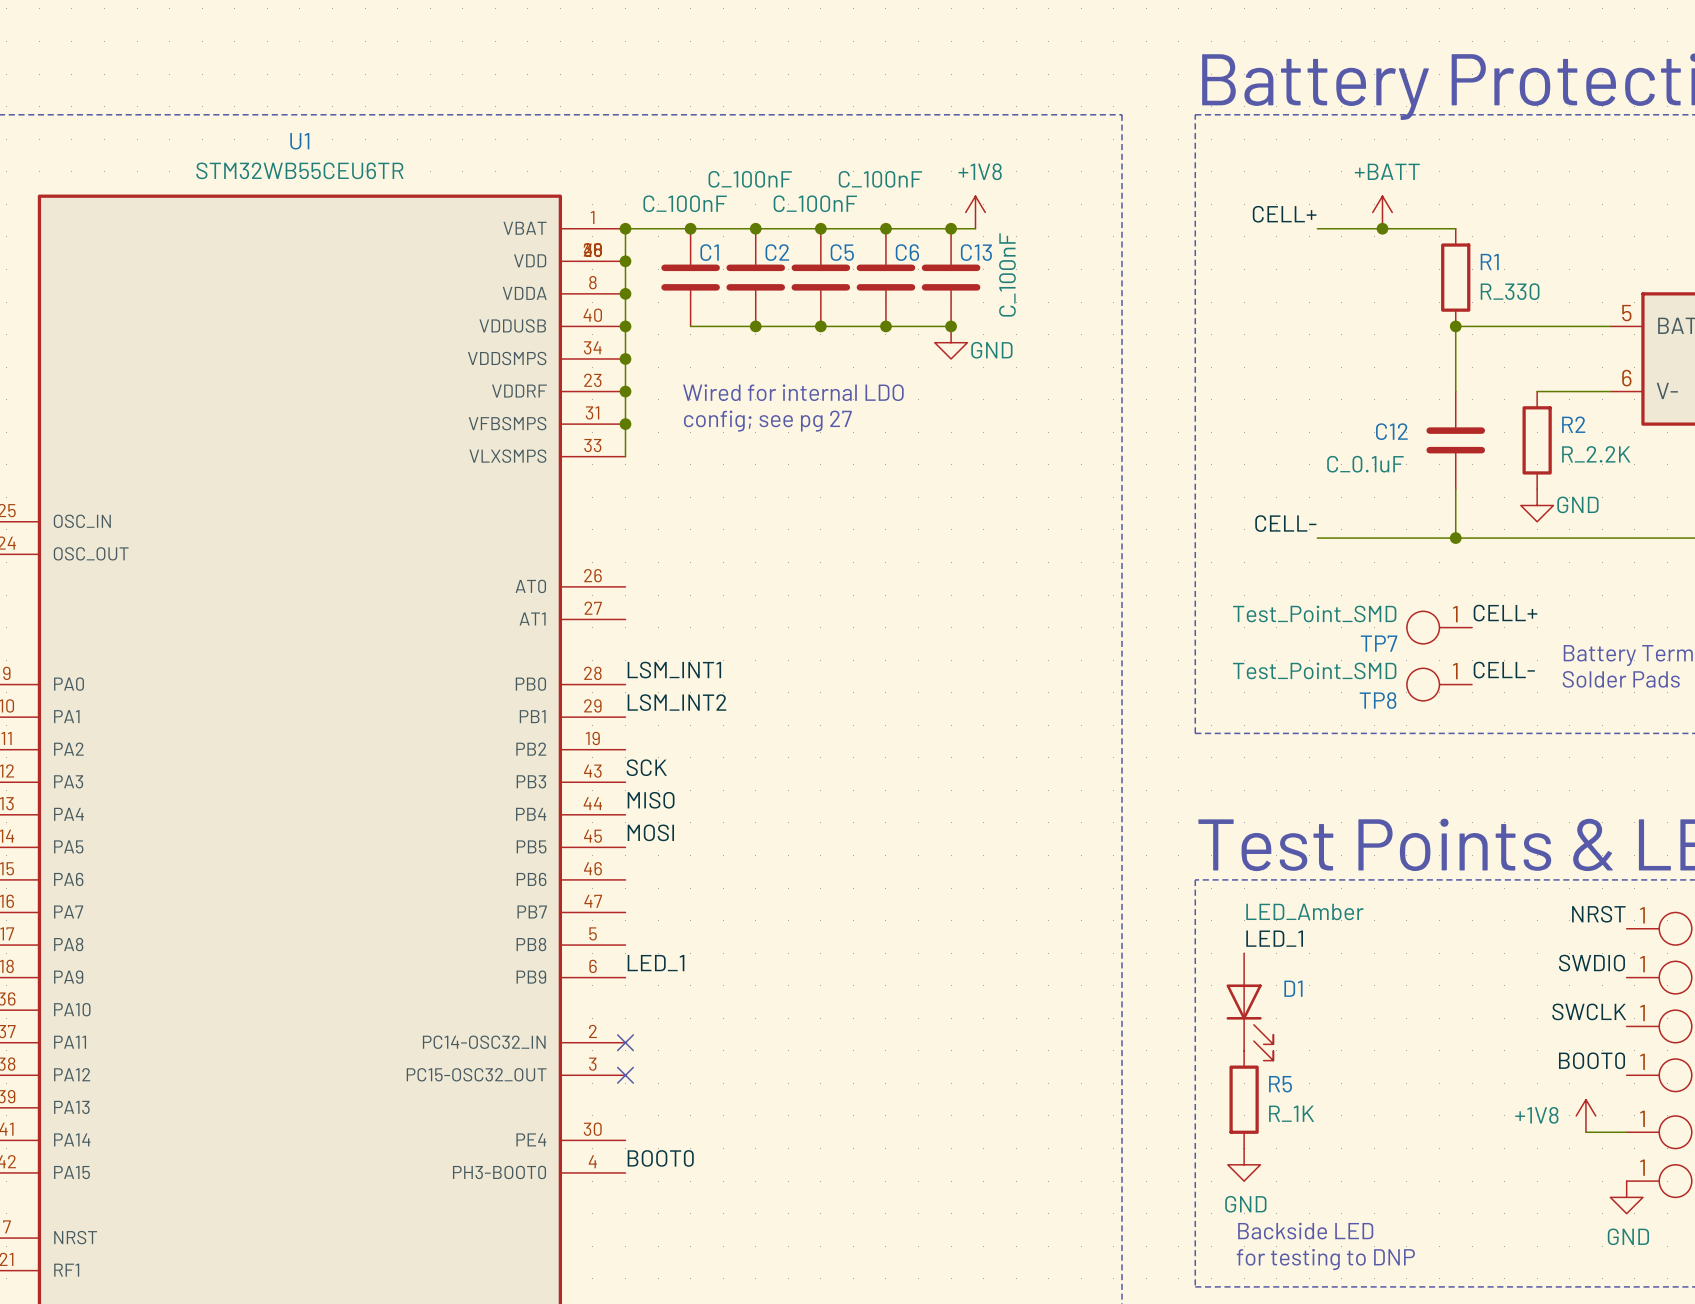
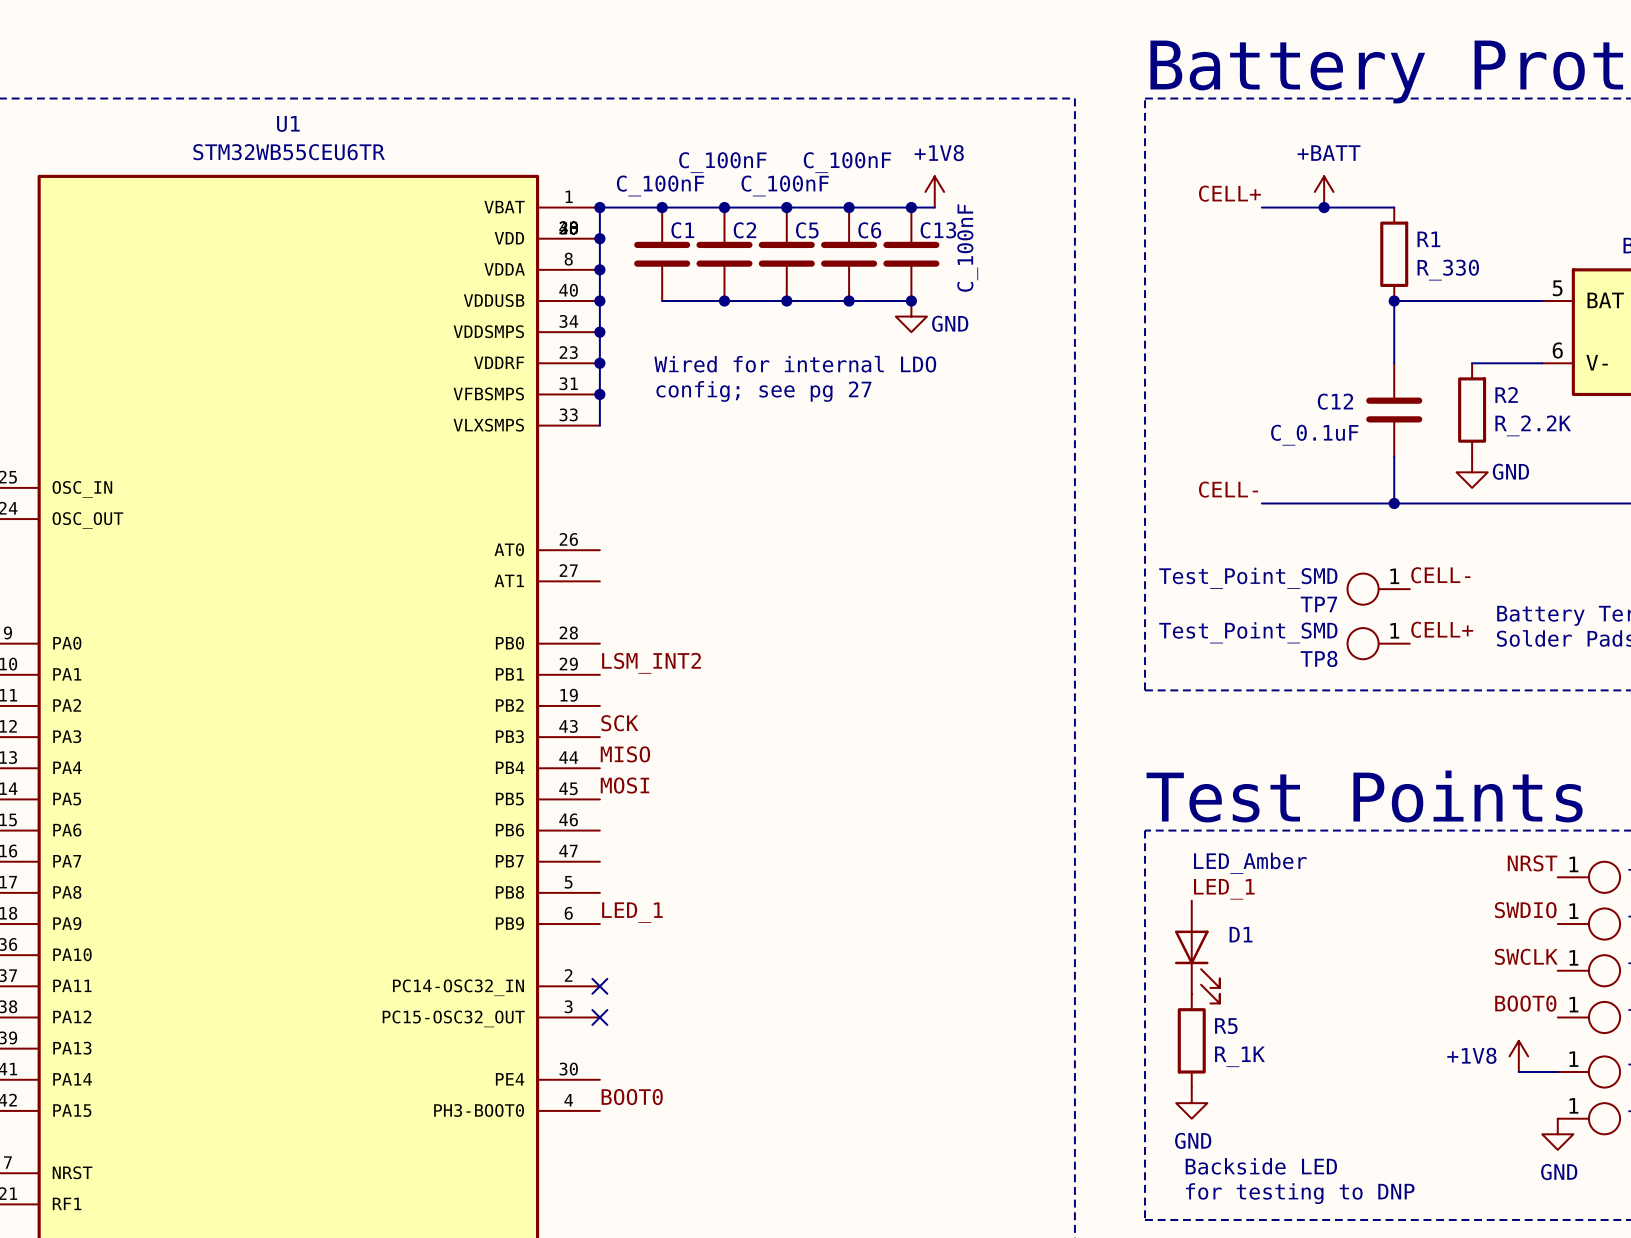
label: CELL+ (1505, 613) -> CELL- (1440, 575)
label: LSM_INT1 (674, 670) -> none
label: CELL- (1504, 670) -> CELL+ (1442, 629)

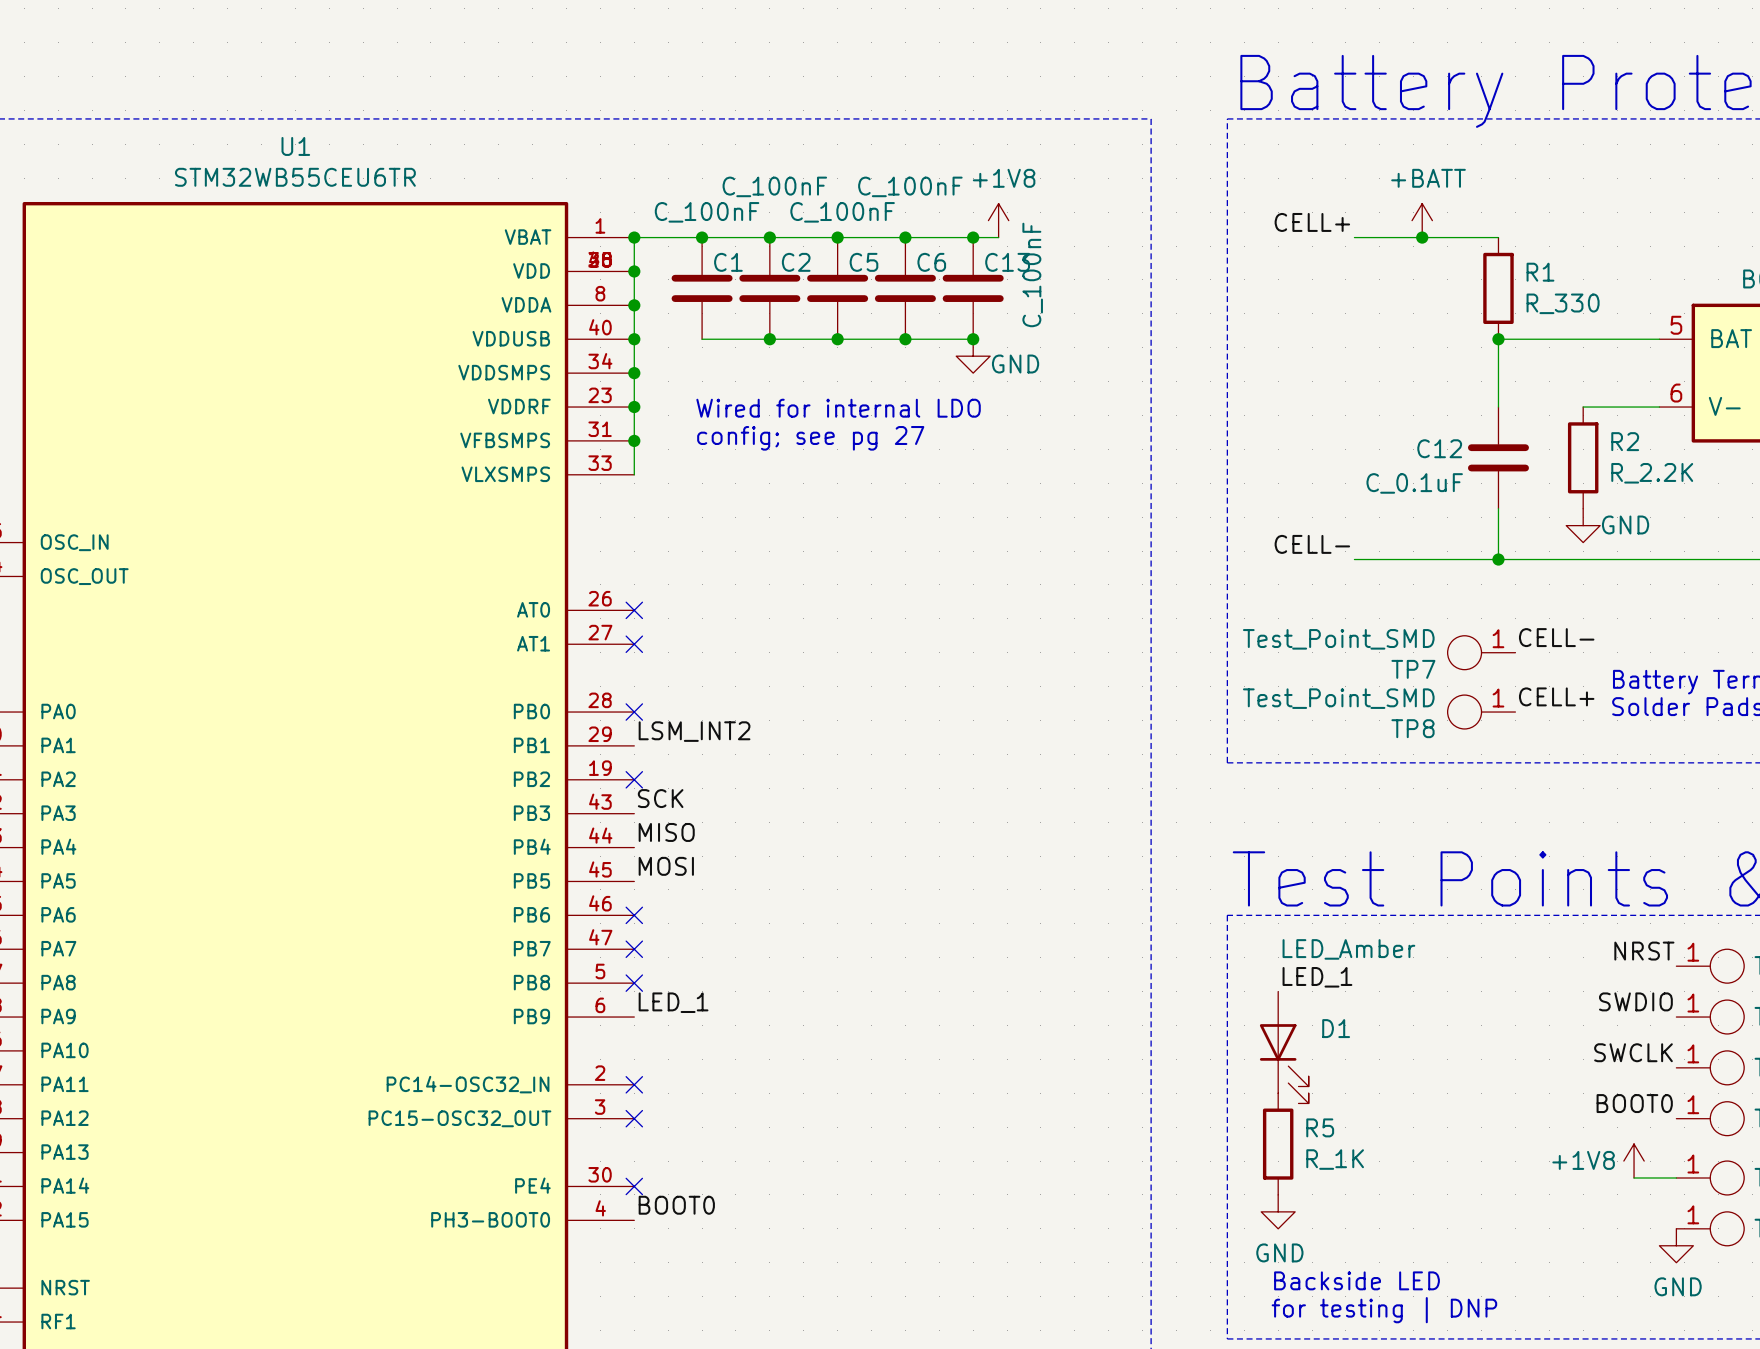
no-connect mark: none -> (634, 610)
no-connect mark: none -> (634, 644)
no-connect mark: none -> (634, 712)
no-connect mark: none -> (634, 779)
no-connect mark: none -> (634, 915)
no-connect mark: none -> (634, 949)
no-connect mark: none -> (634, 983)
no-connect mark: none -> (634, 1186)
text: for testing to DNP (1300, 1193) -> for testing | DNP (1384, 1310)

